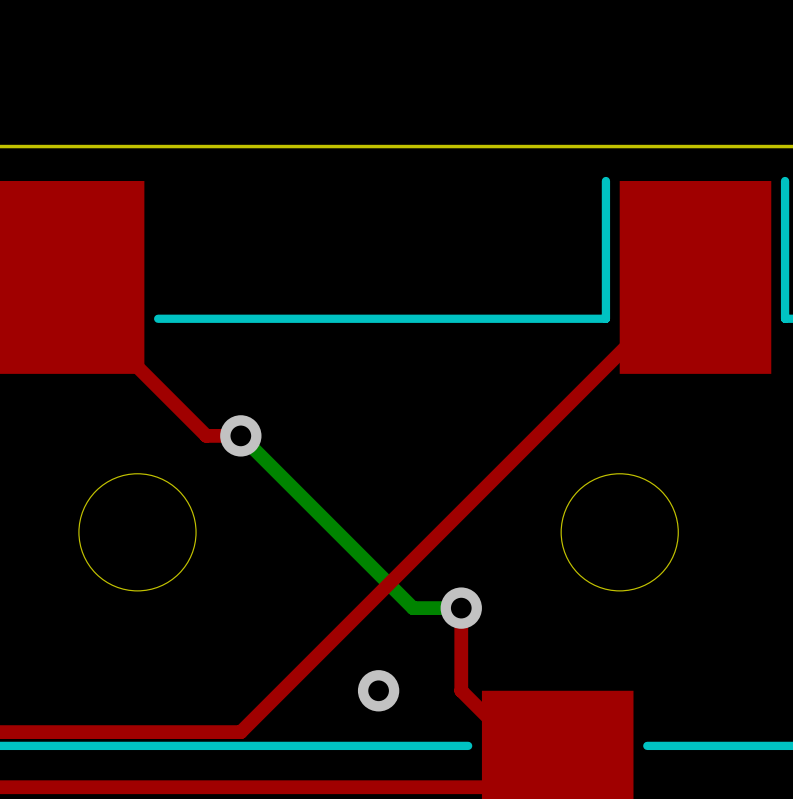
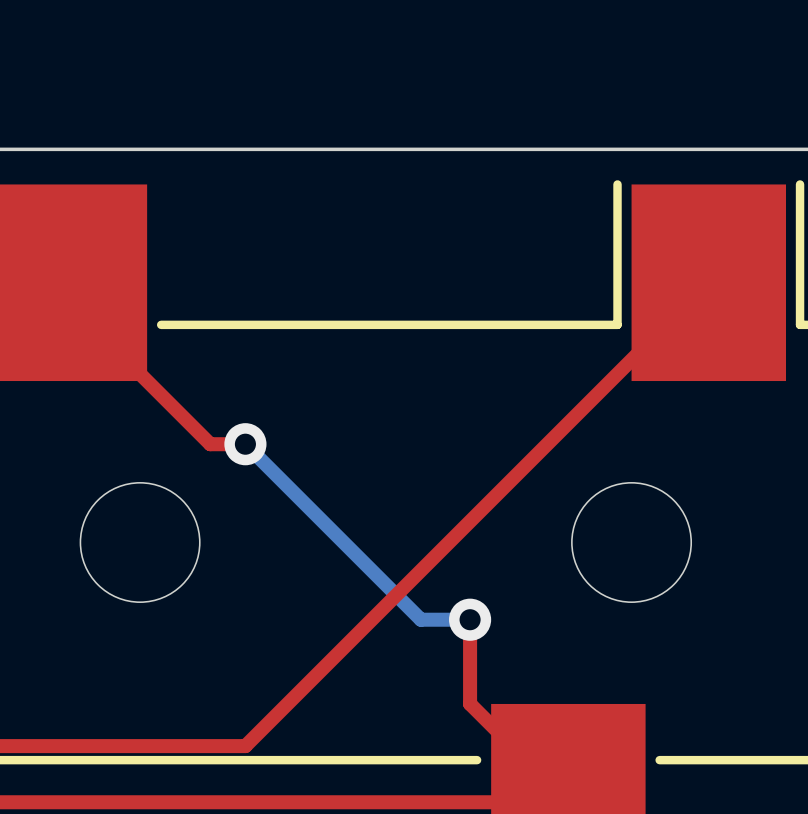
via: (378, 690) -> none

